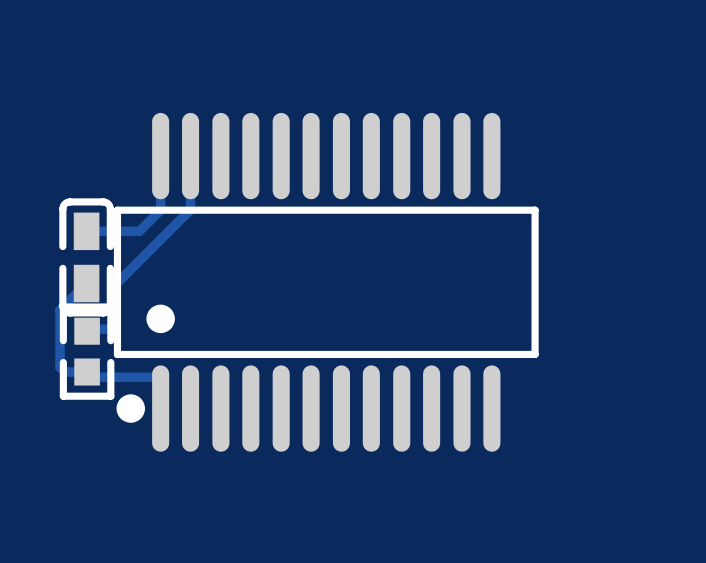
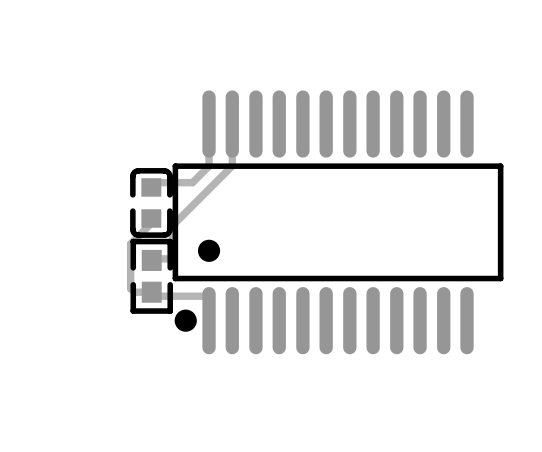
part footprint: [59, 198, 114, 317] -> [130, 168, 173, 238]

